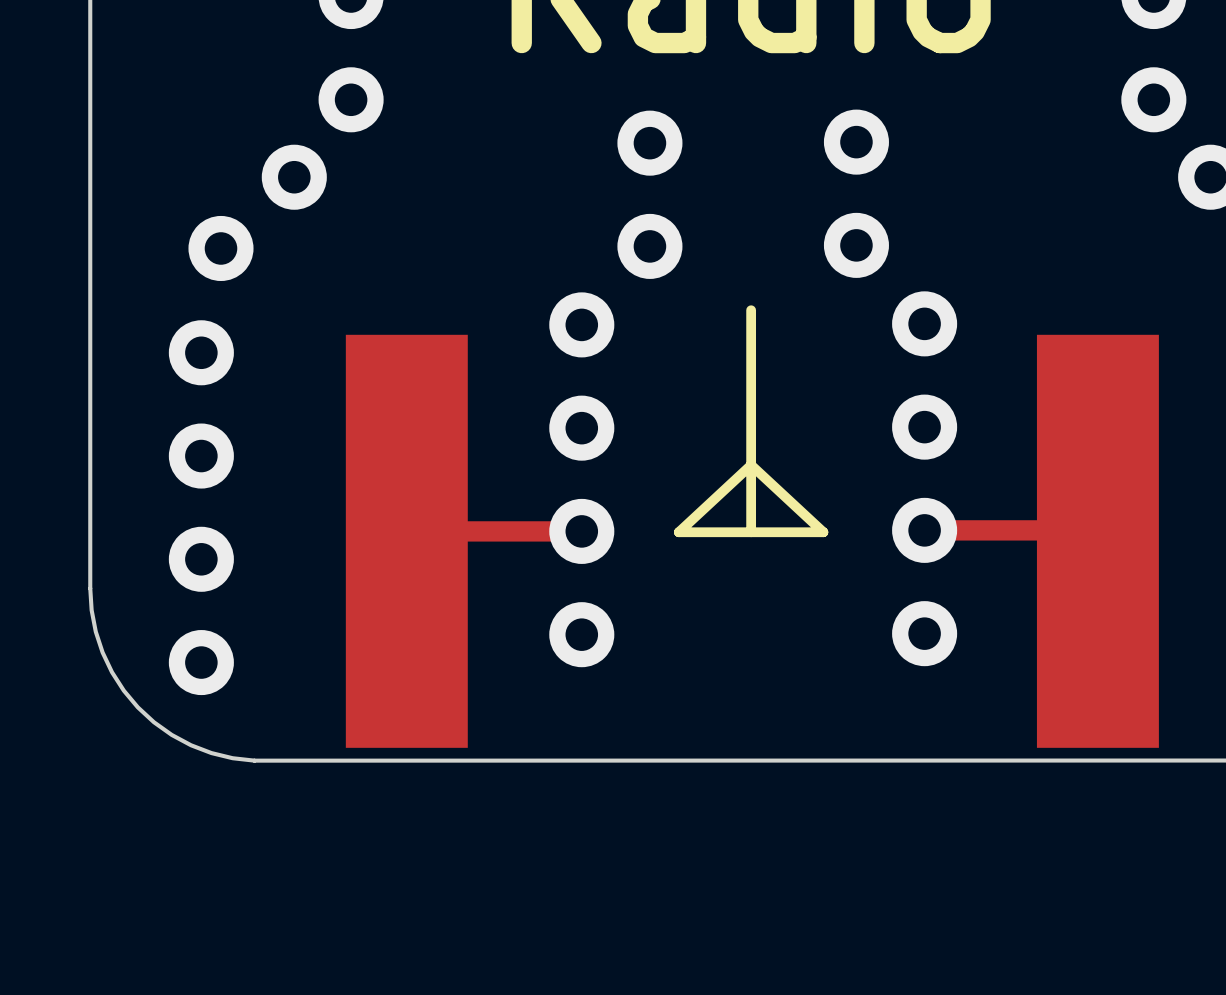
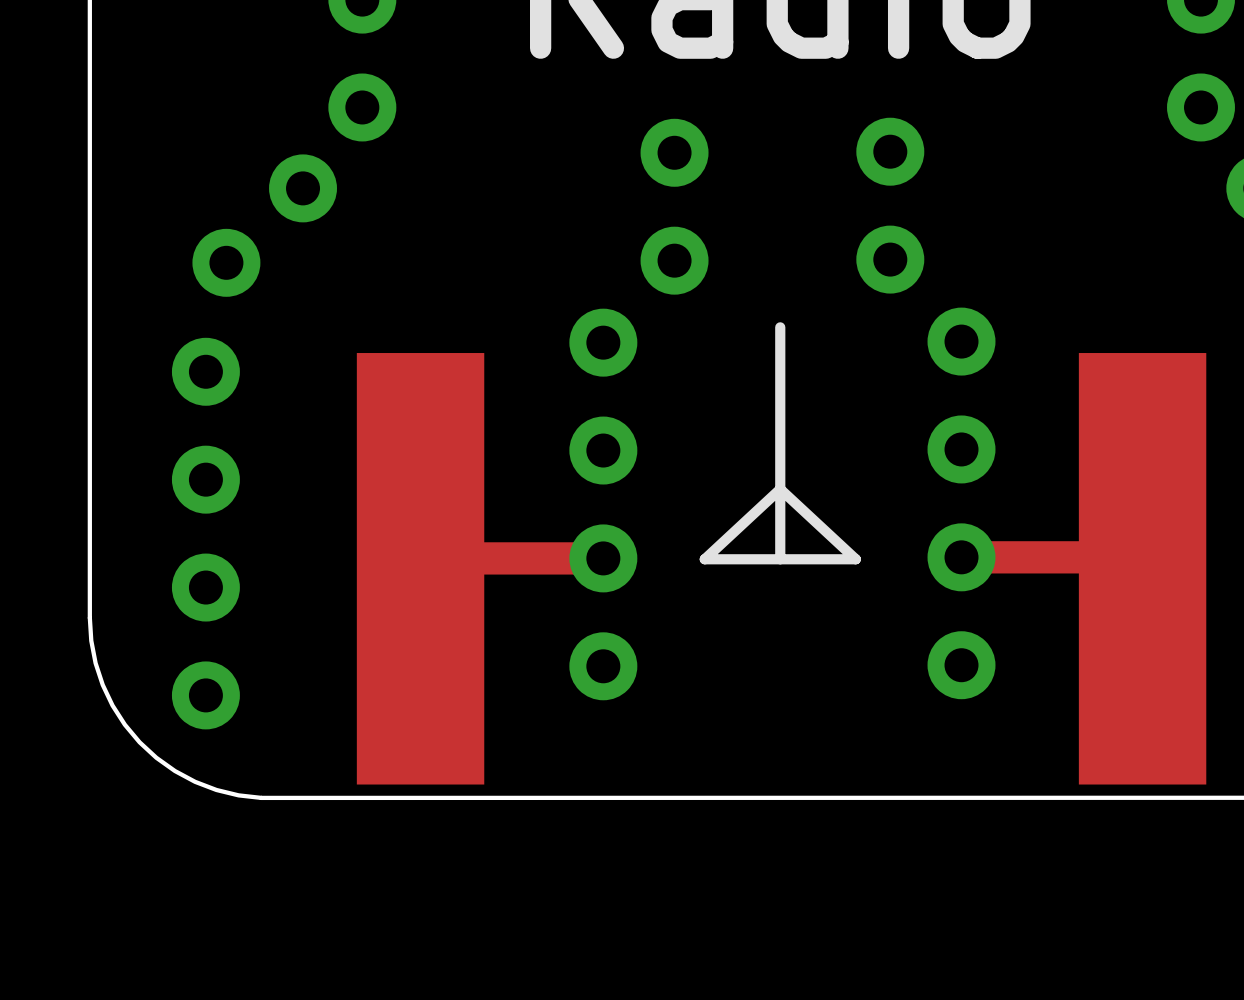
track width: thin (924, 530) (1086, 530) (1097, 541) -> thick (961, 557) (1131, 557) (1142, 568)
track width: thin (581, 531) (416, 531) (406, 541) -> thick (603, 558) (430, 558) (420, 568)

